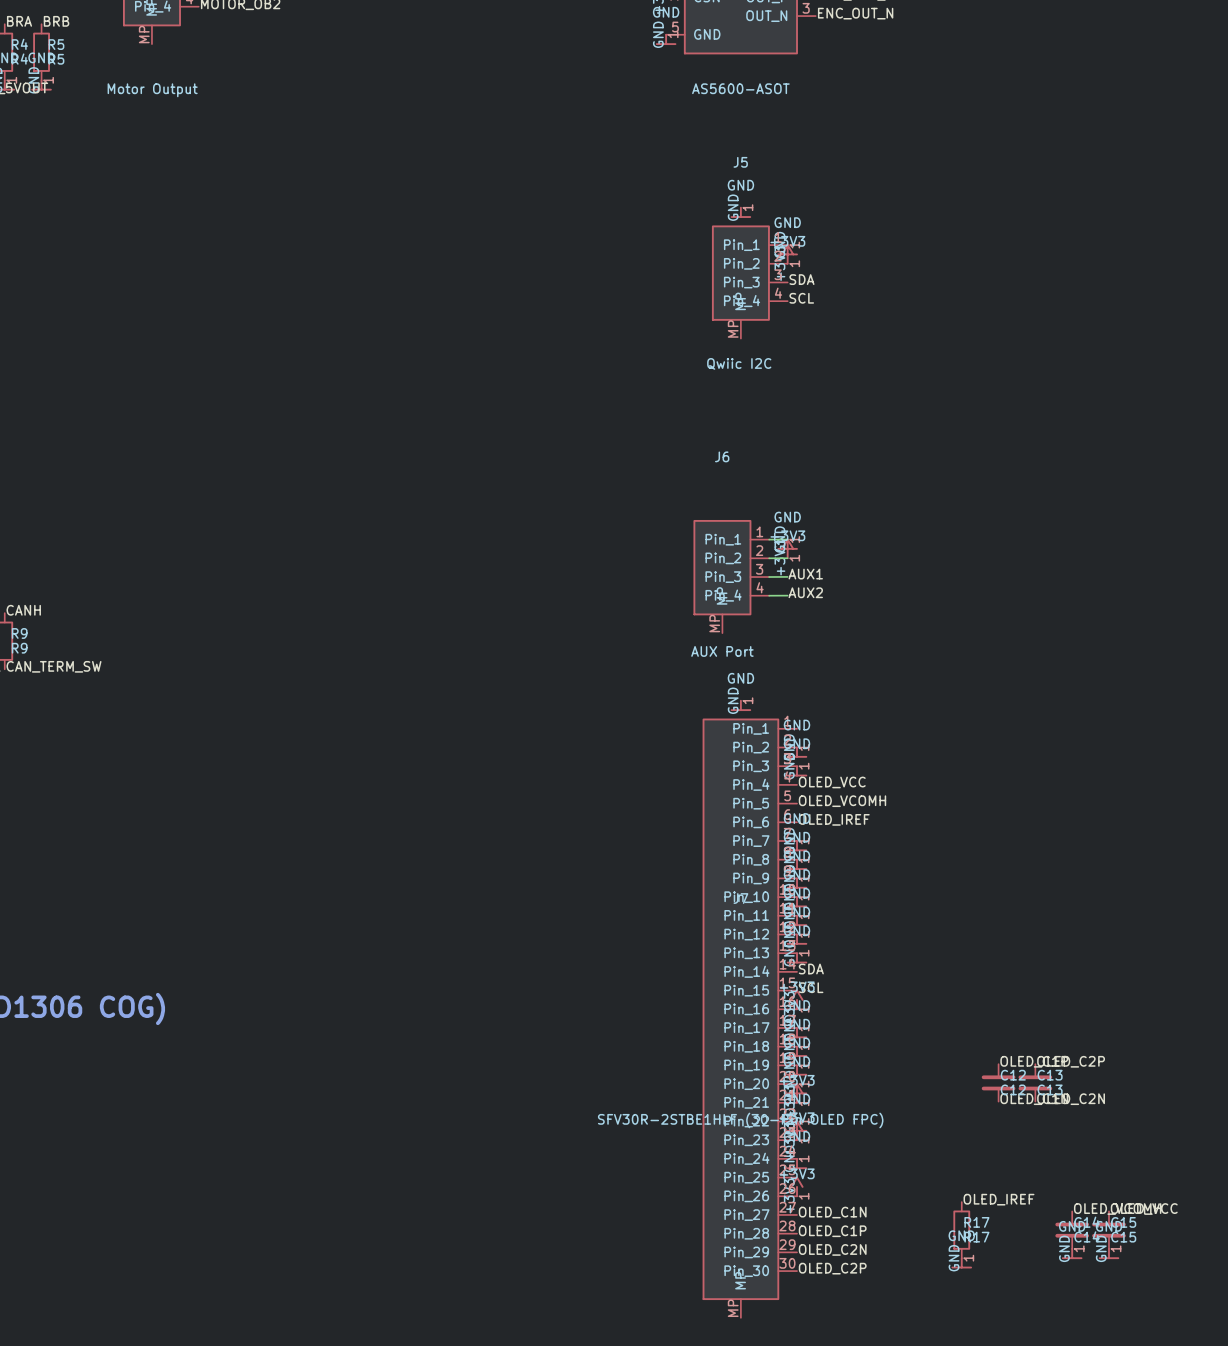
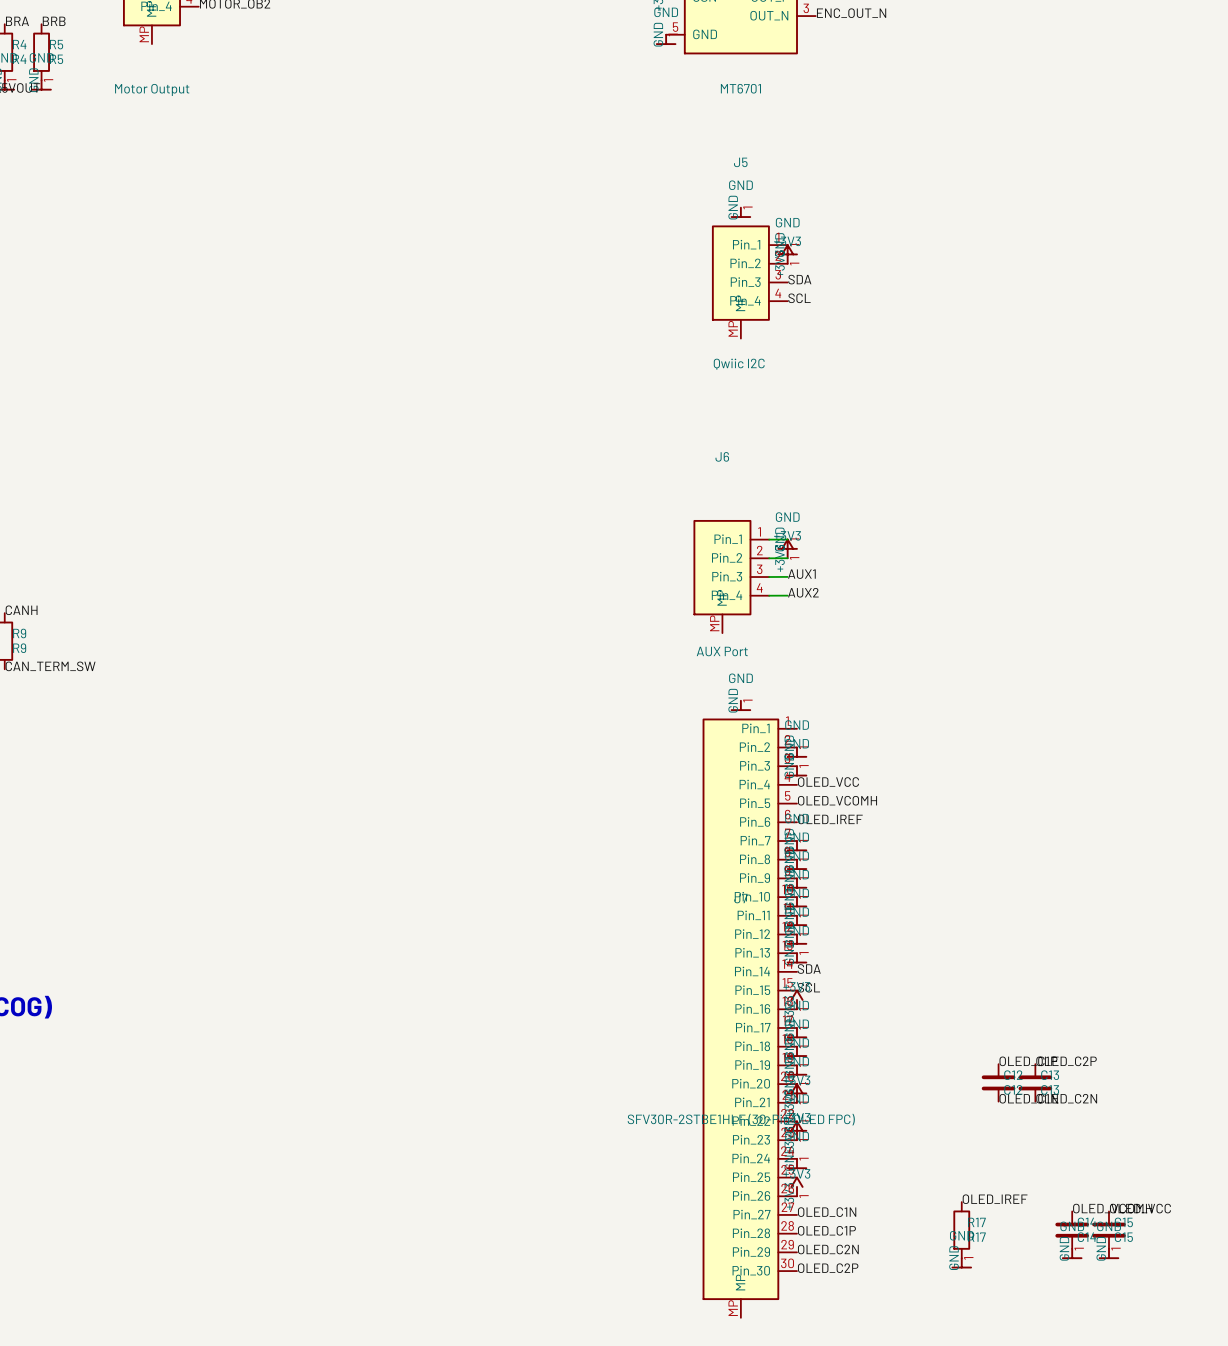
part value: AS5600-ASOT (740, 88) -> MT6701 (740, 88)

